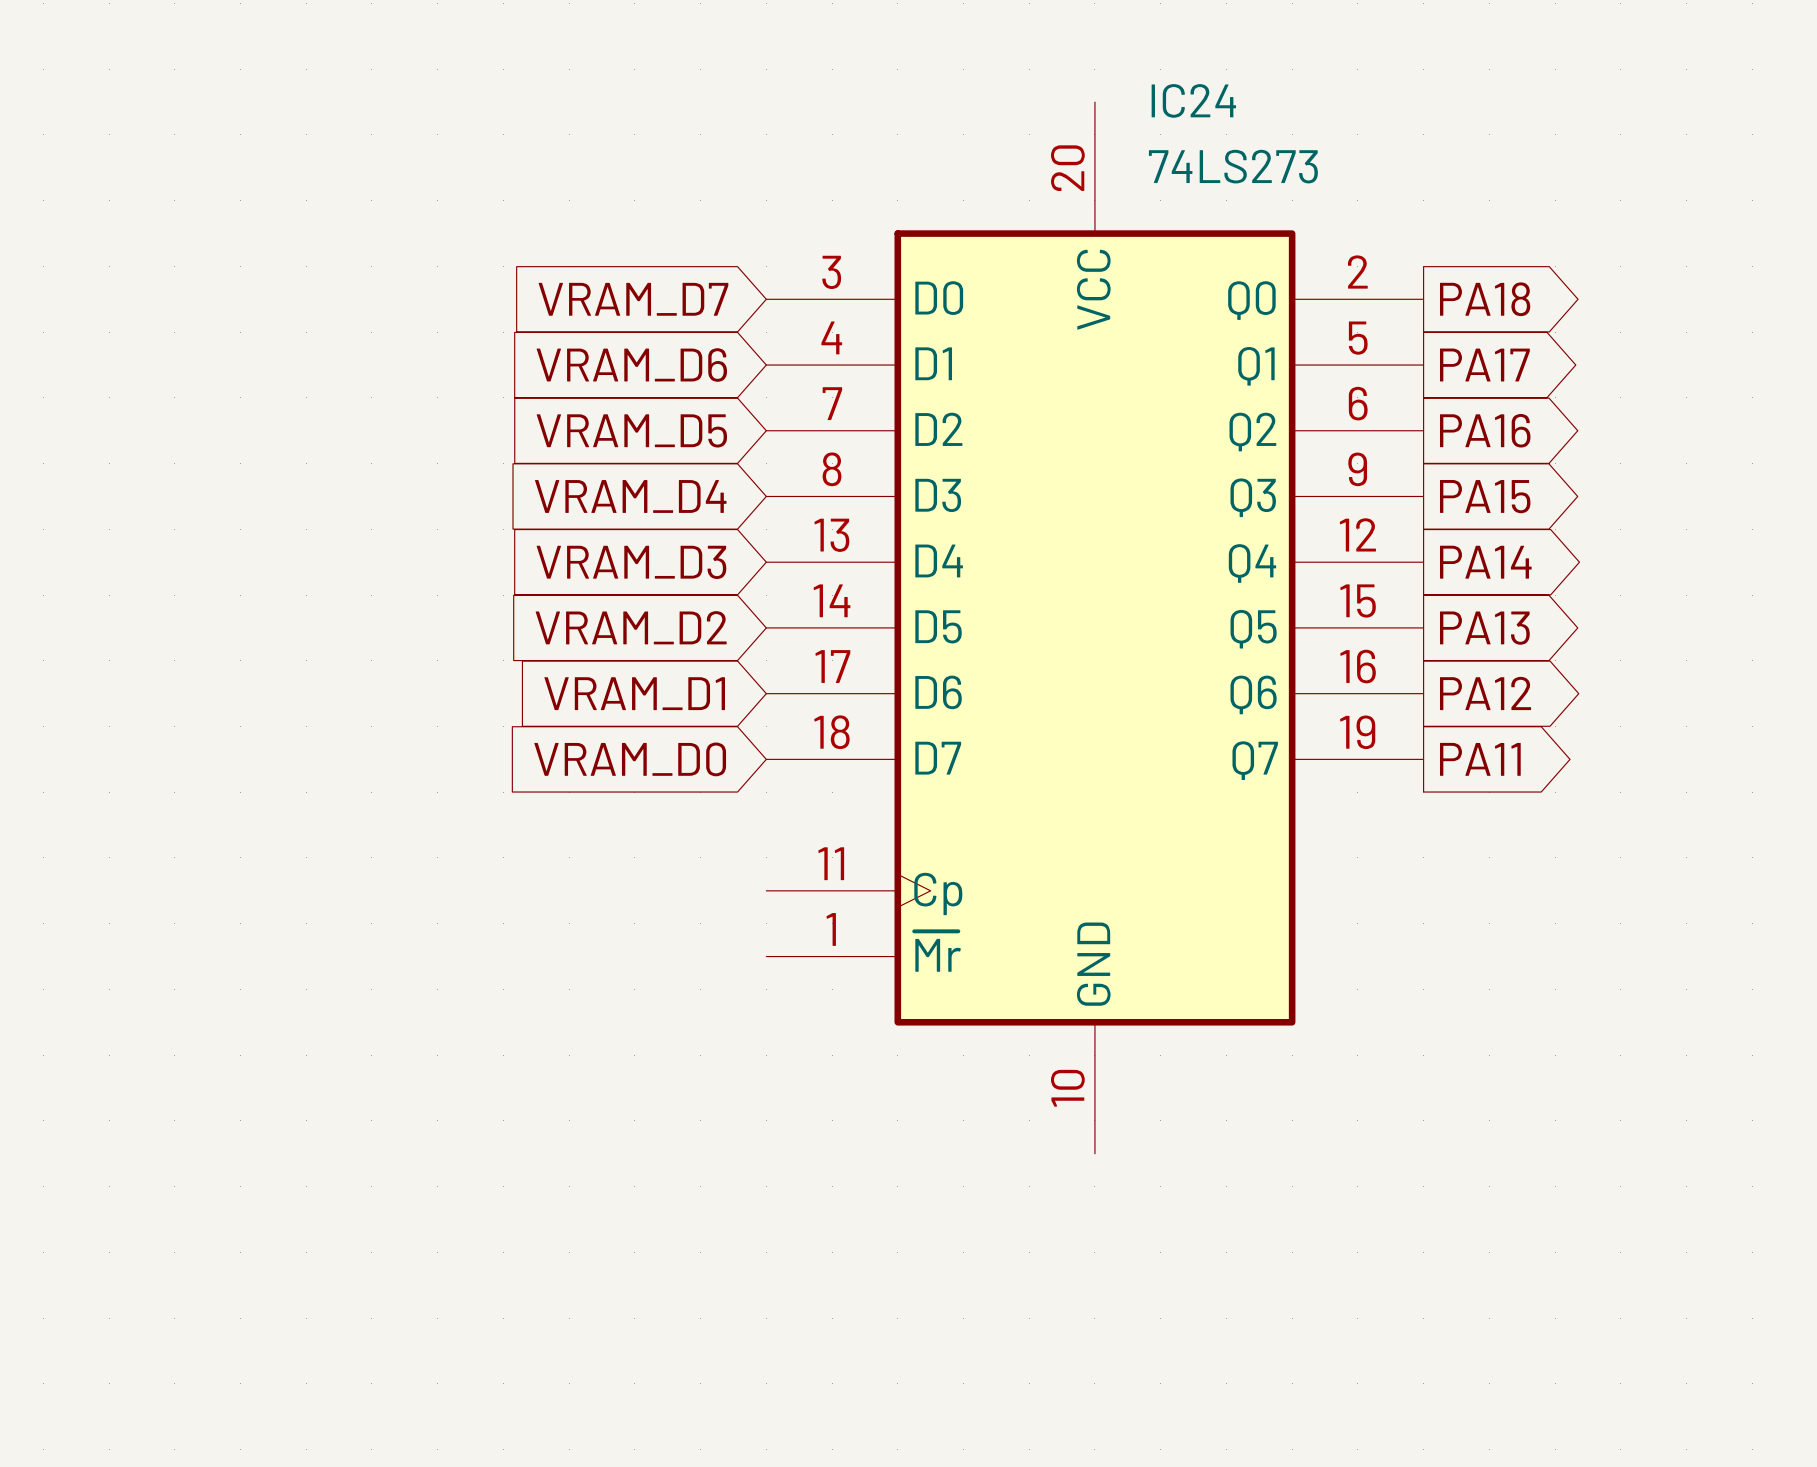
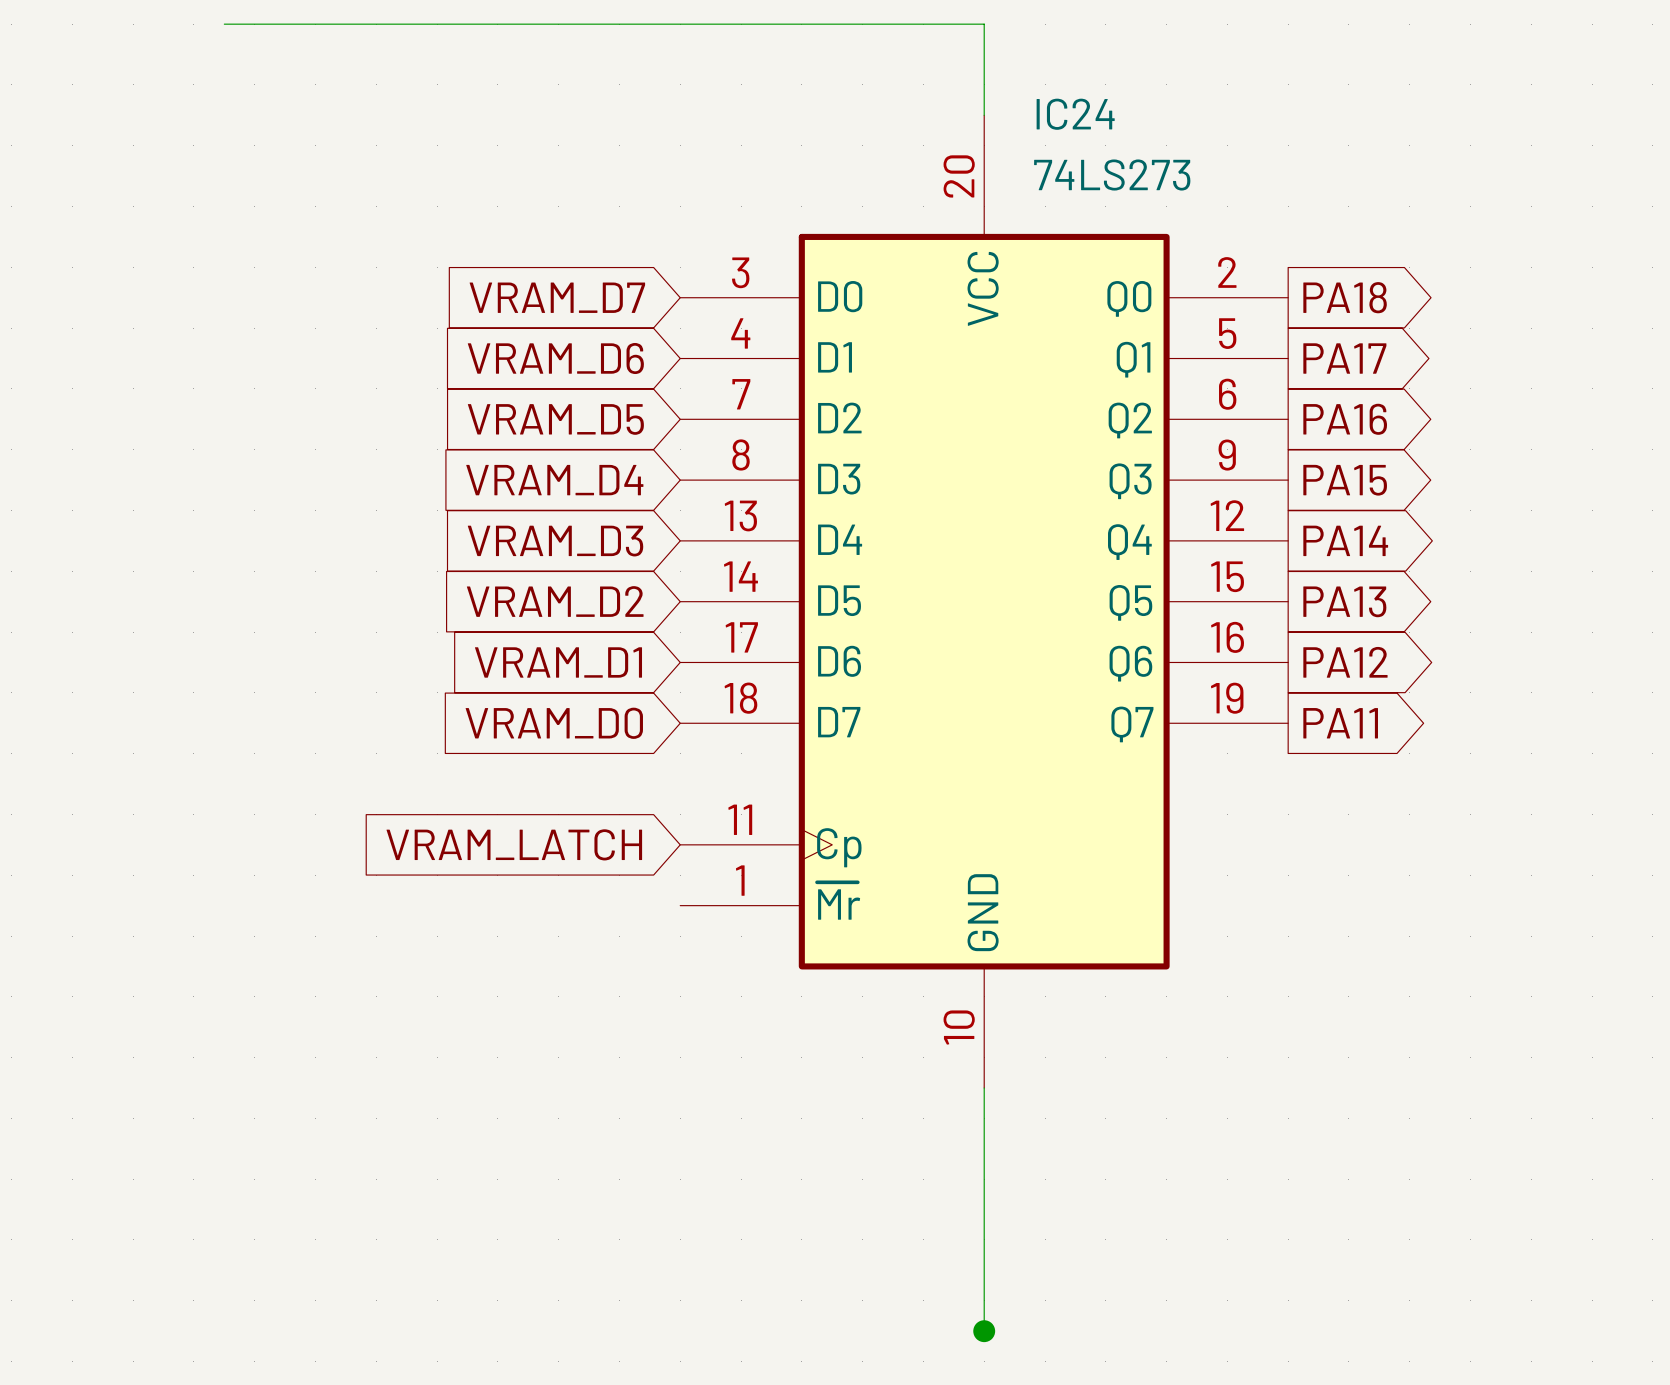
wire: none -> (224, 24) (984, 24) (984, 115)
global label: none -> VRAM_LATCH (514, 844)
wire: none -> (984, 1088) (984, 1331)
junction: none -> (984, 1331)

